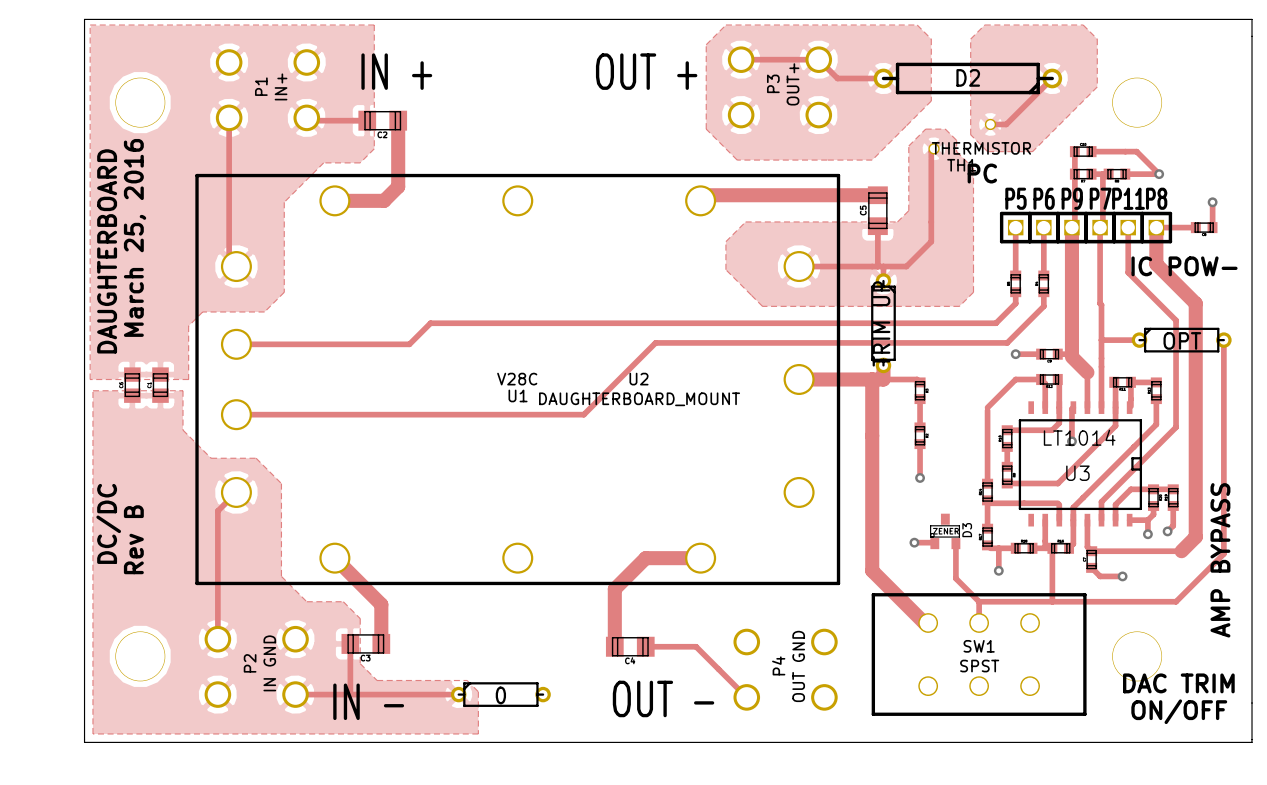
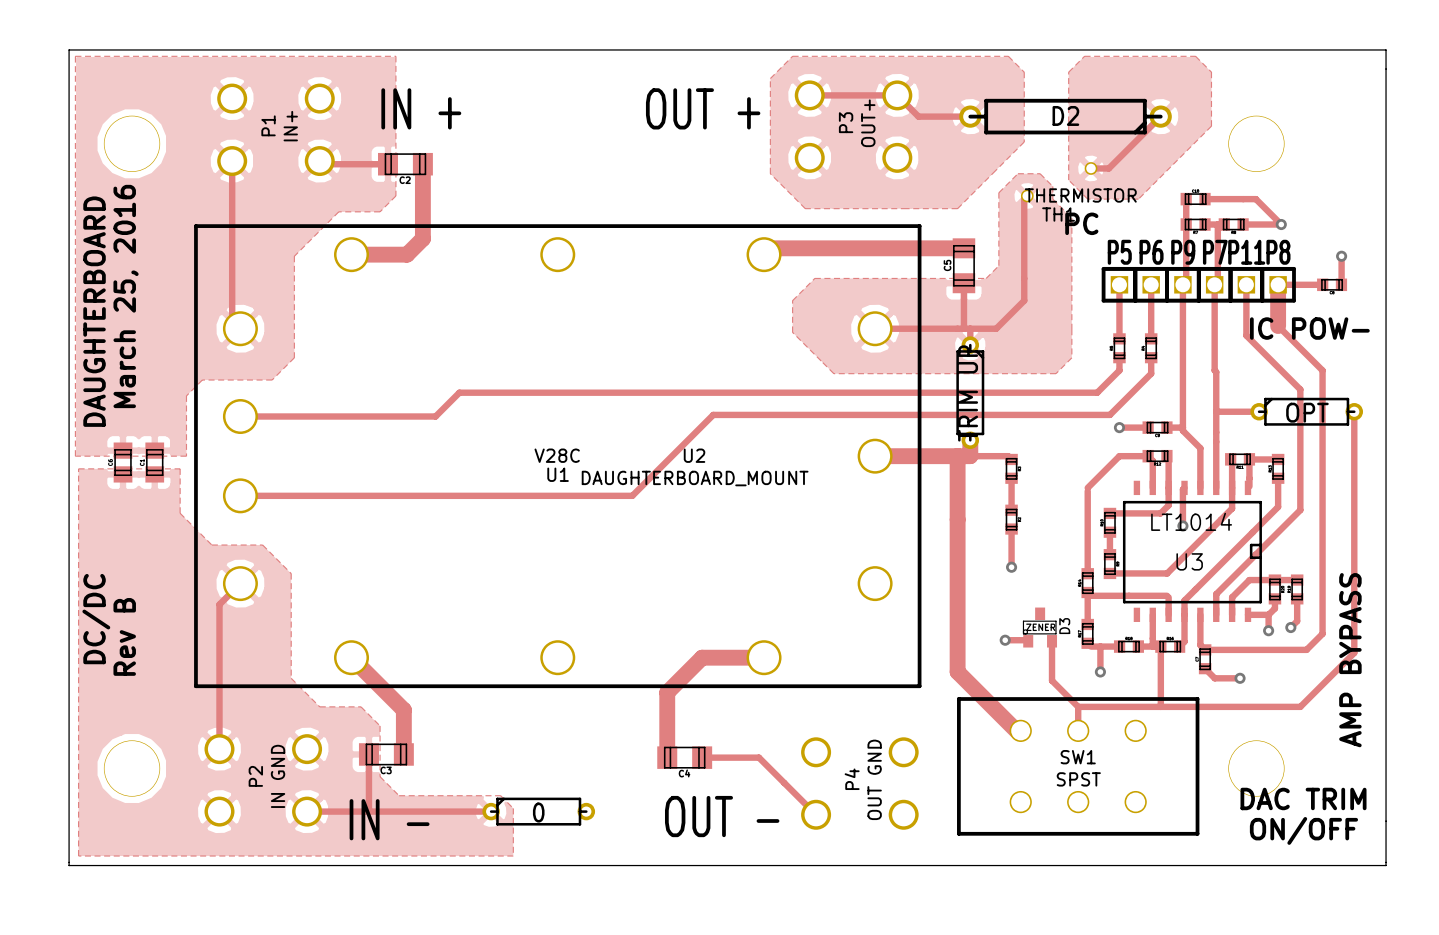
track width: thick (1071, 227) (1071, 354) -> thin (1182, 284) (1182, 427)
track width: thick (1156, 264) (1195, 303) (1195, 537) (1181, 551) -> thin (1278, 326) (1322, 370) (1322, 633) (1306, 649)
track width: thick (1071, 356) (1087, 372) -> thin (1182, 430) (1200, 448)

